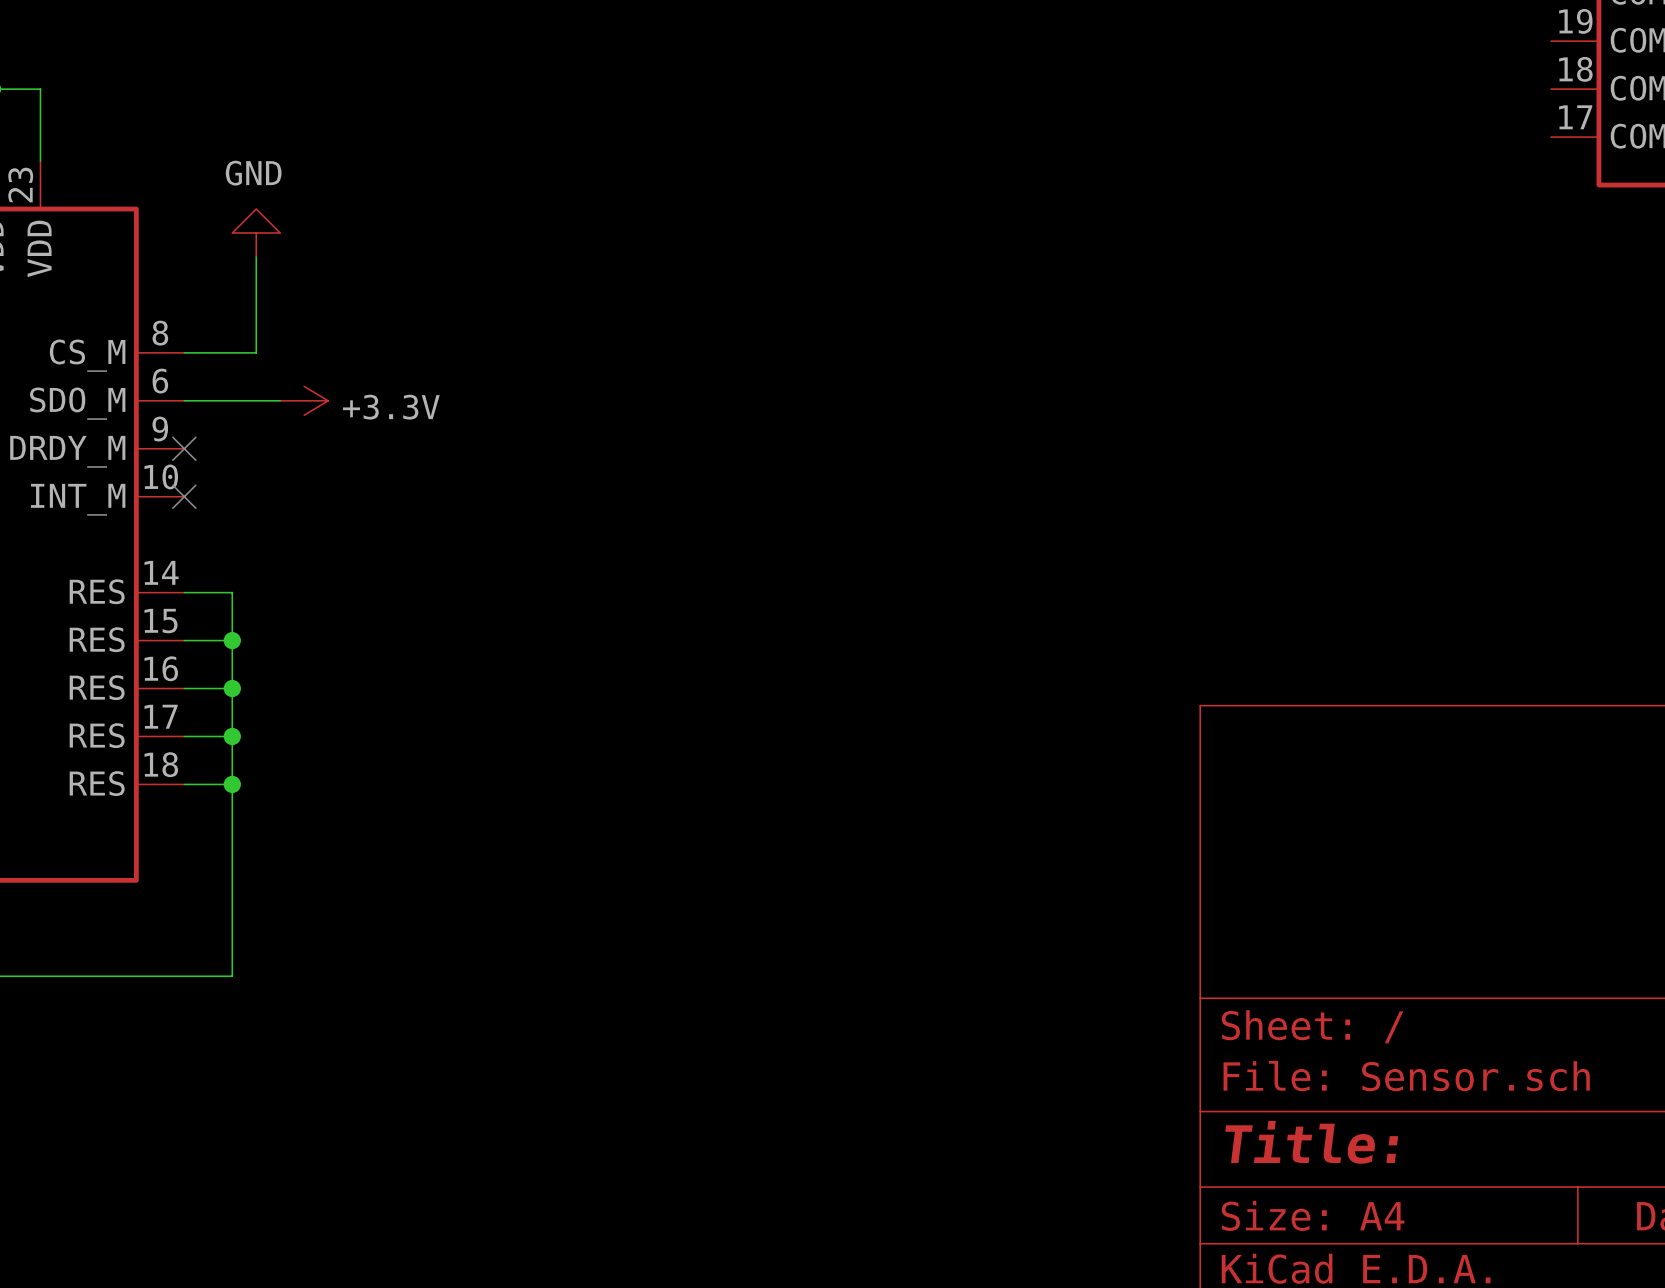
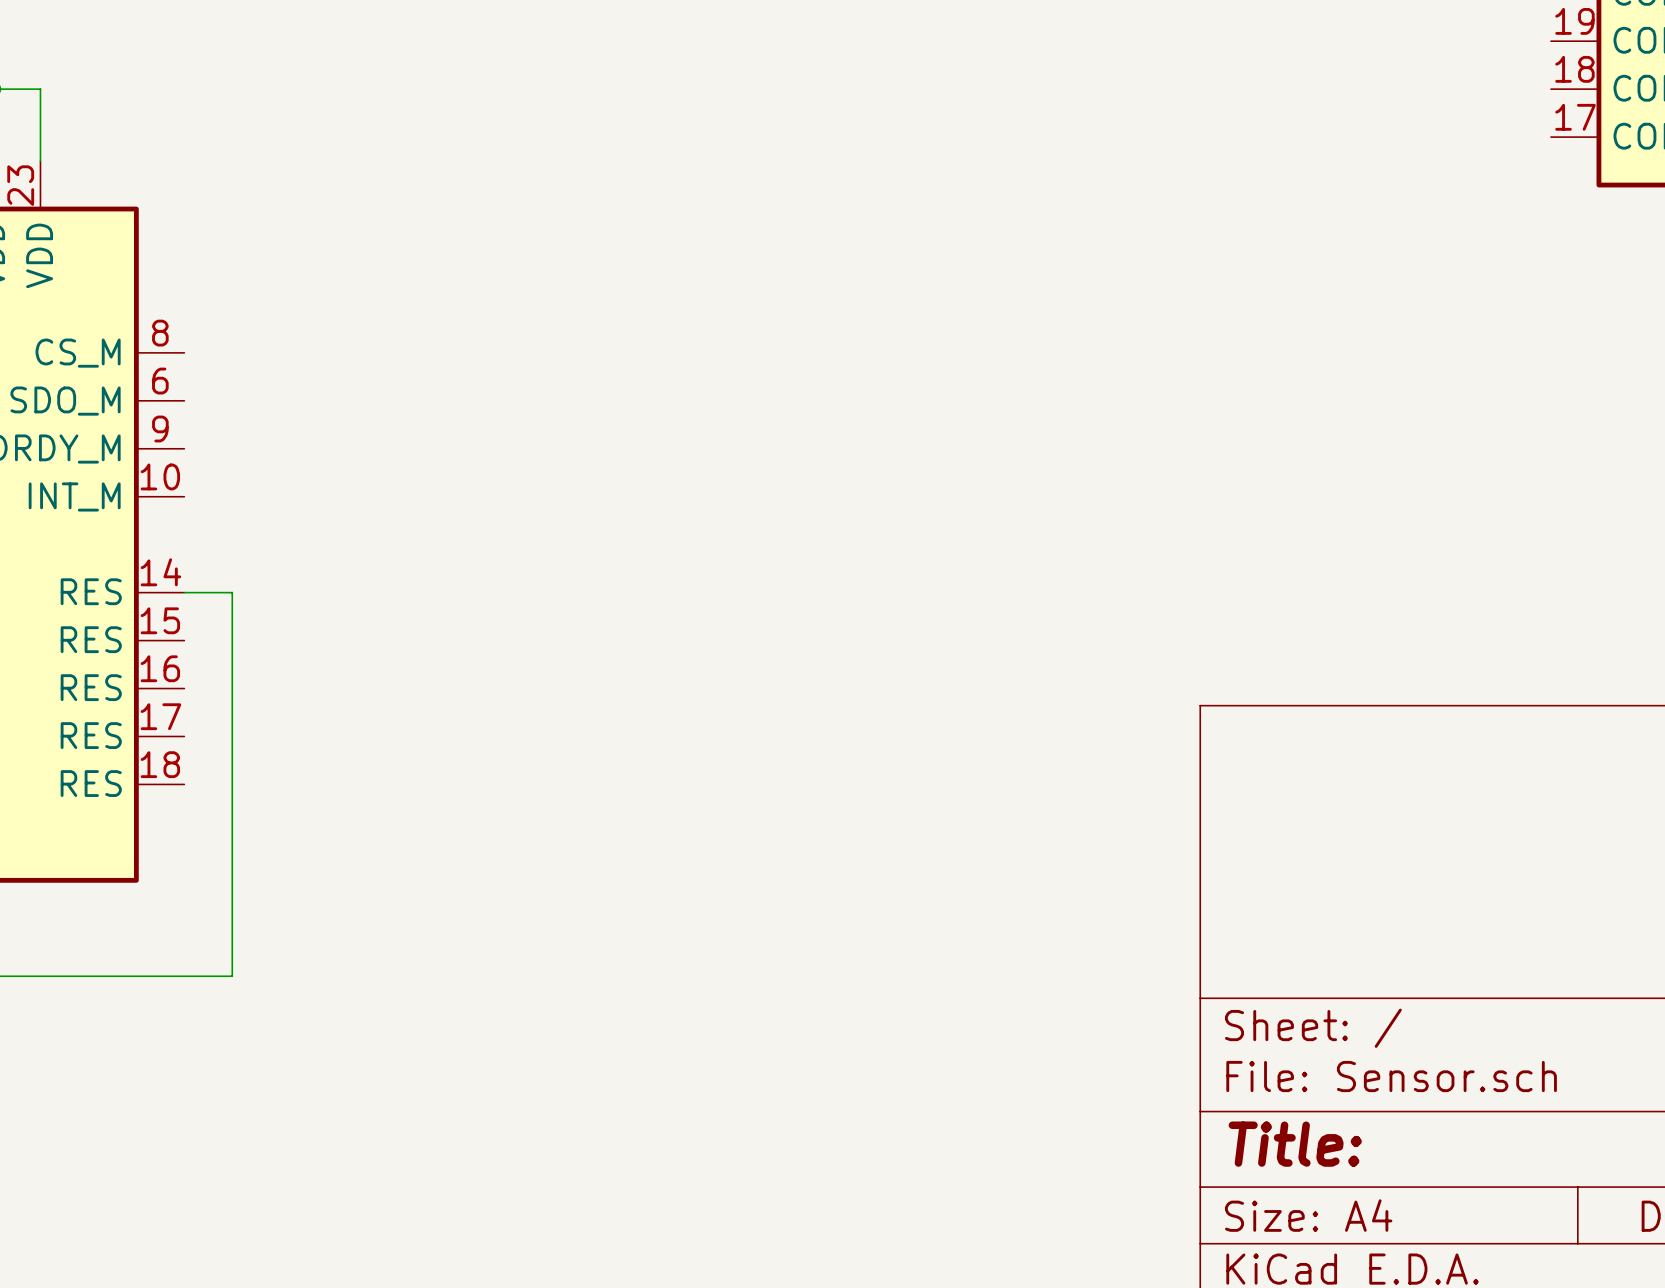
power symbol: GND (256, 232) -> none
wire: (256, 256) (256, 352) (184, 352) -> none
wire: (184, 400) (280, 400) -> none
power symbol: +3.3V (304, 400) -> none
no-connect mark: (184, 448) -> none
no-connect mark: (184, 496) -> none
wire: (184, 640) (232, 640) -> none
junction: (232, 640) -> none
wire: (184, 688) (232, 688) -> none
junction: (232, 688) -> none
wire: (184, 736) (232, 736) -> none
junction: (232, 736) -> none
wire: (184, 784) (232, 784) -> none
junction: (232, 784) -> none

